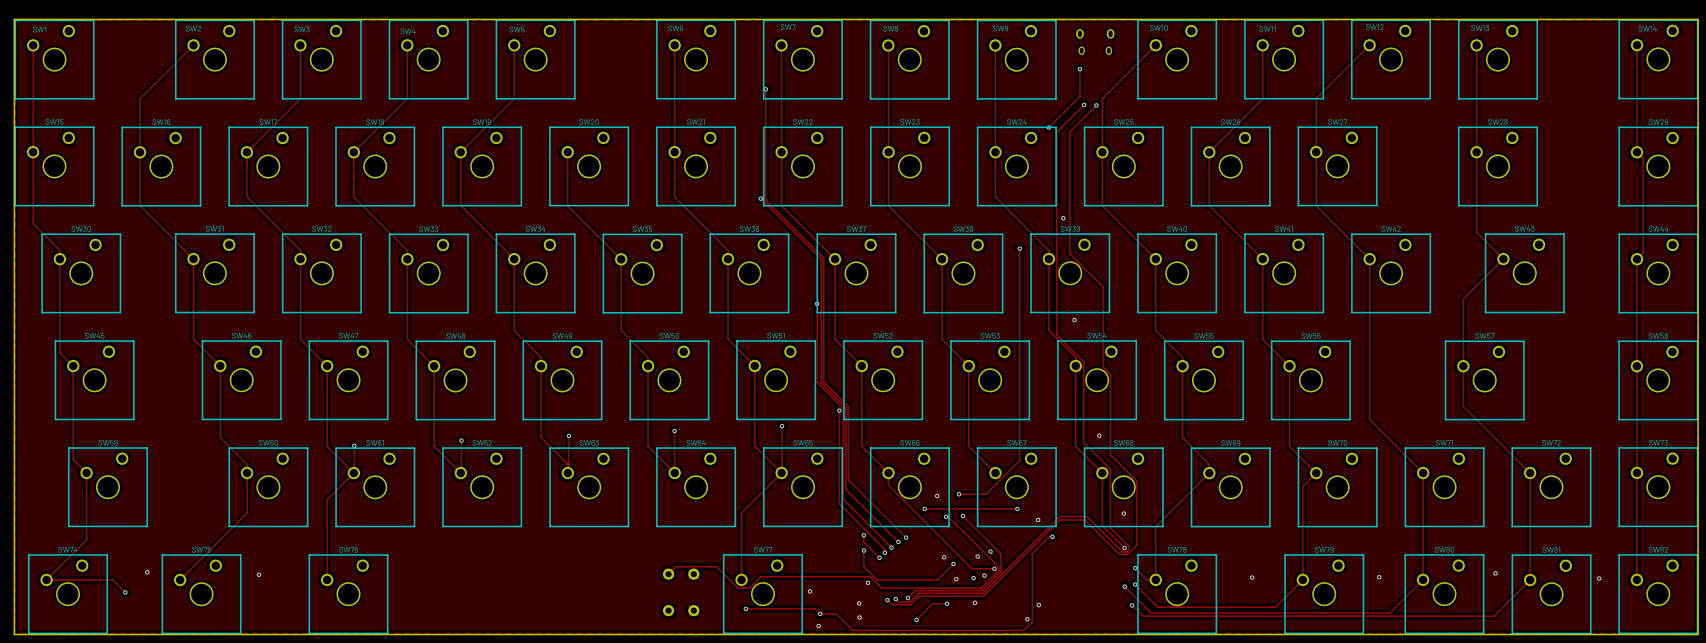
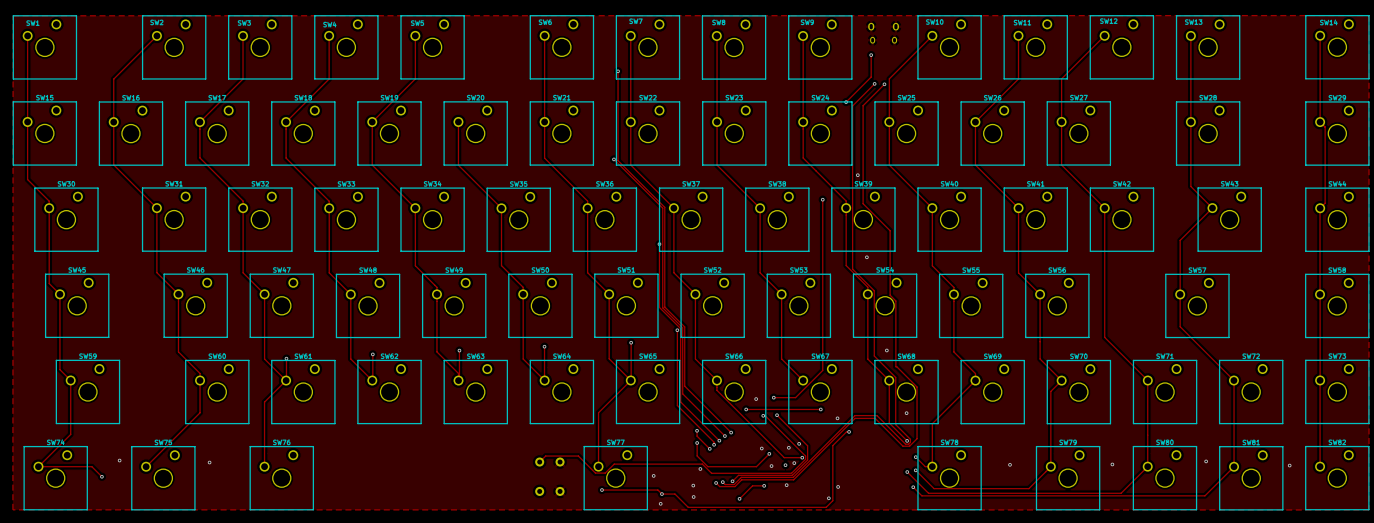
board edge: (14, 19) (1698, 19) (1698, 634) (14, 634) (14, 19) -> none

